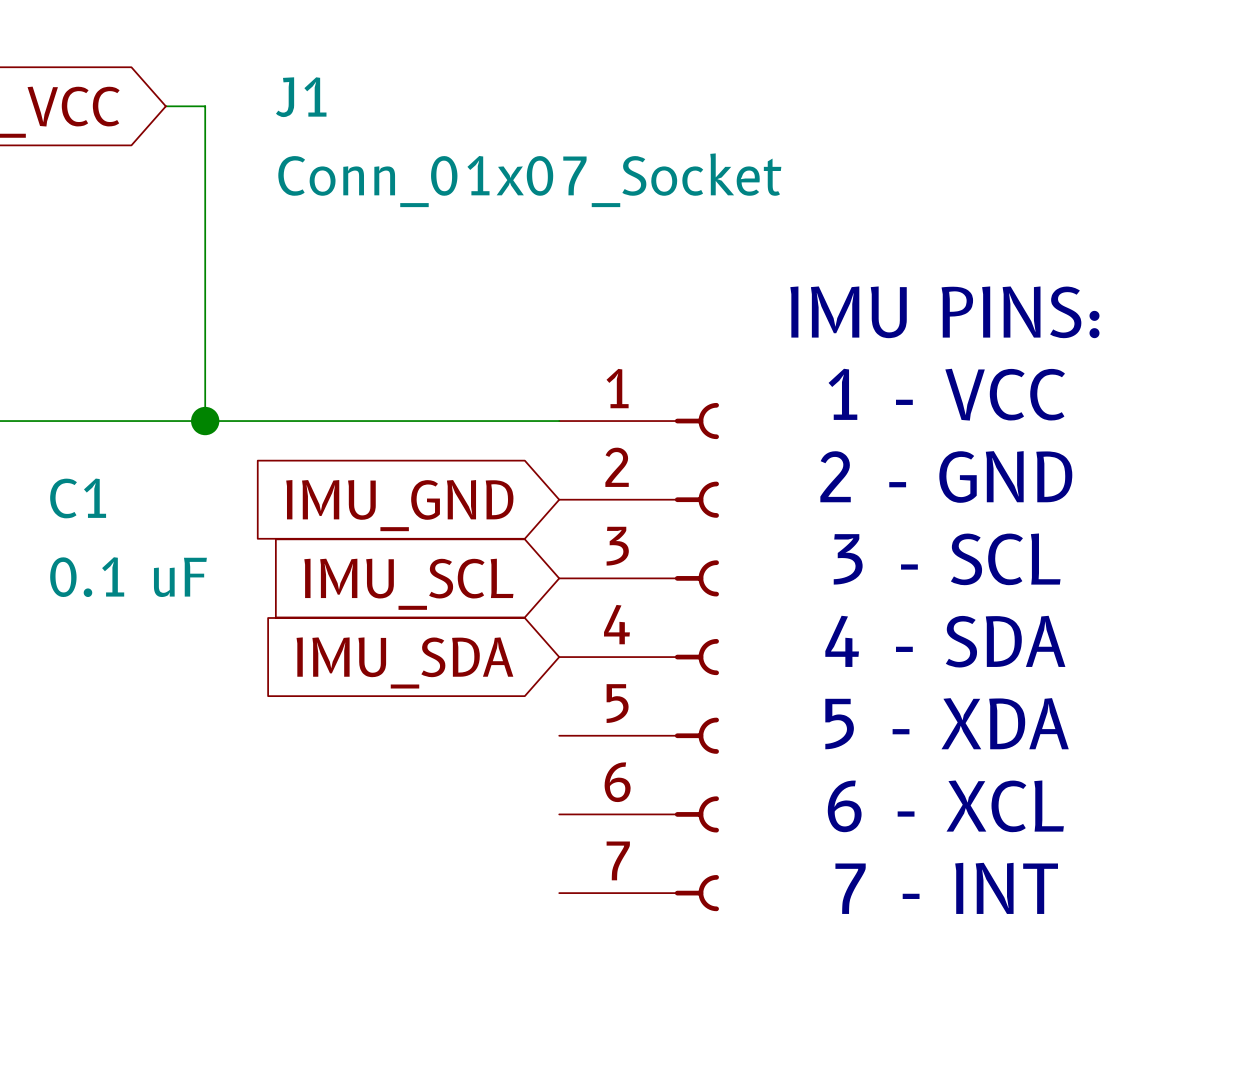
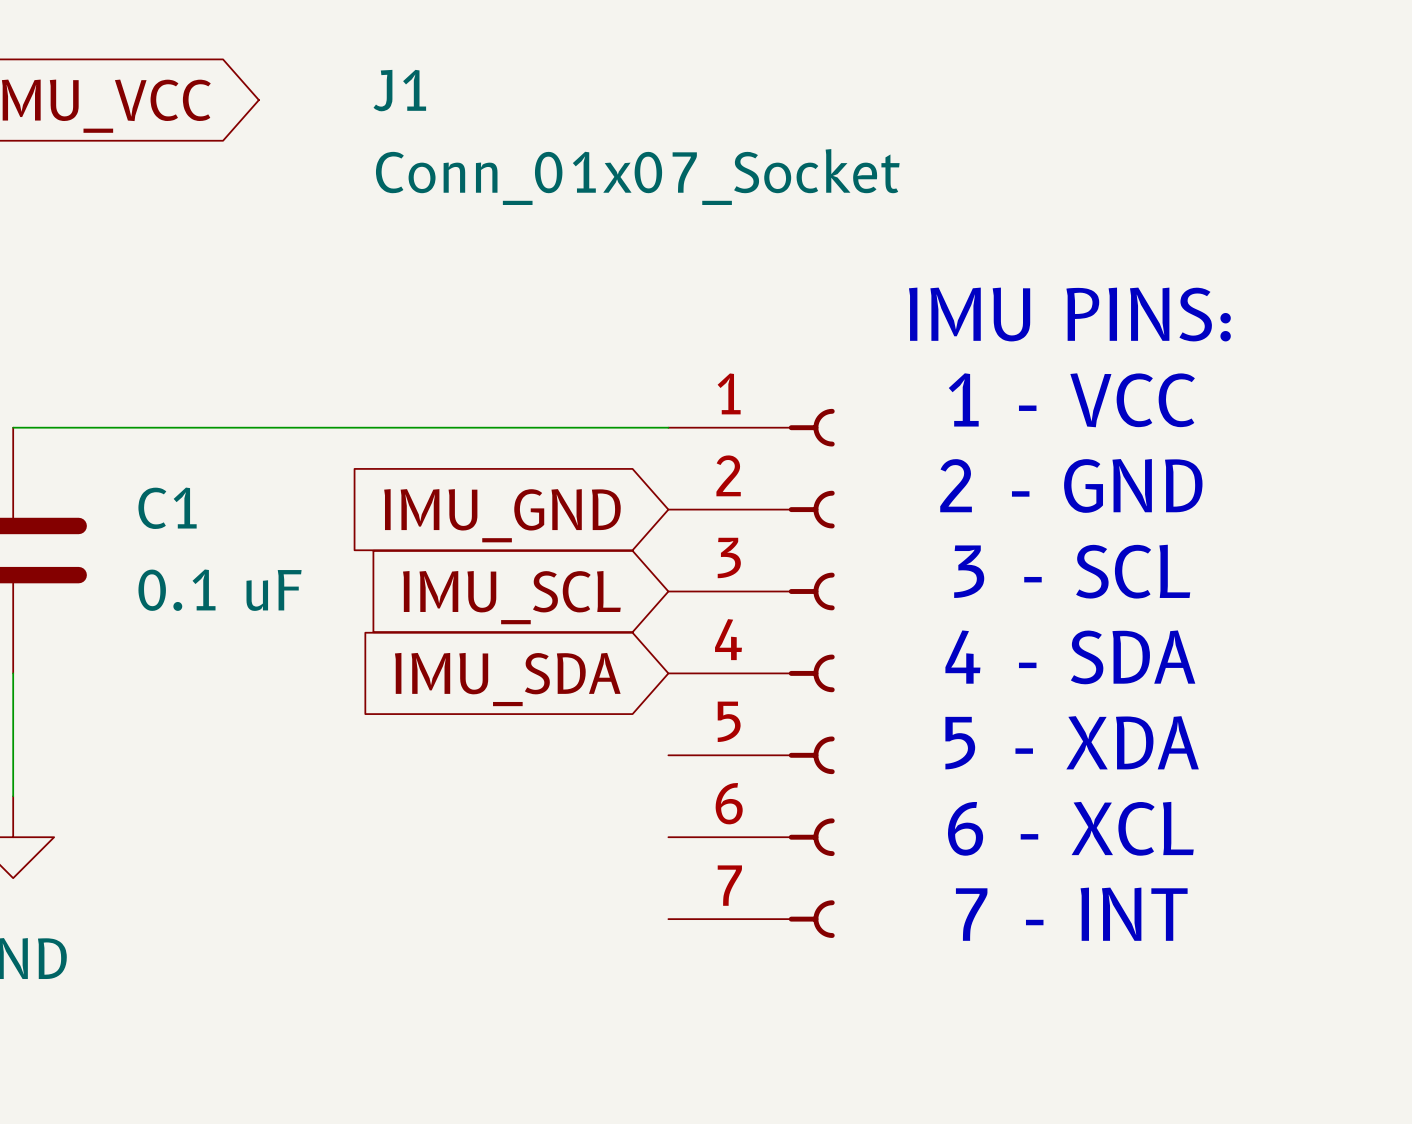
wire: (165, 106) (205, 106) (205, 421) -> none
junction: (205, 421) -> none

